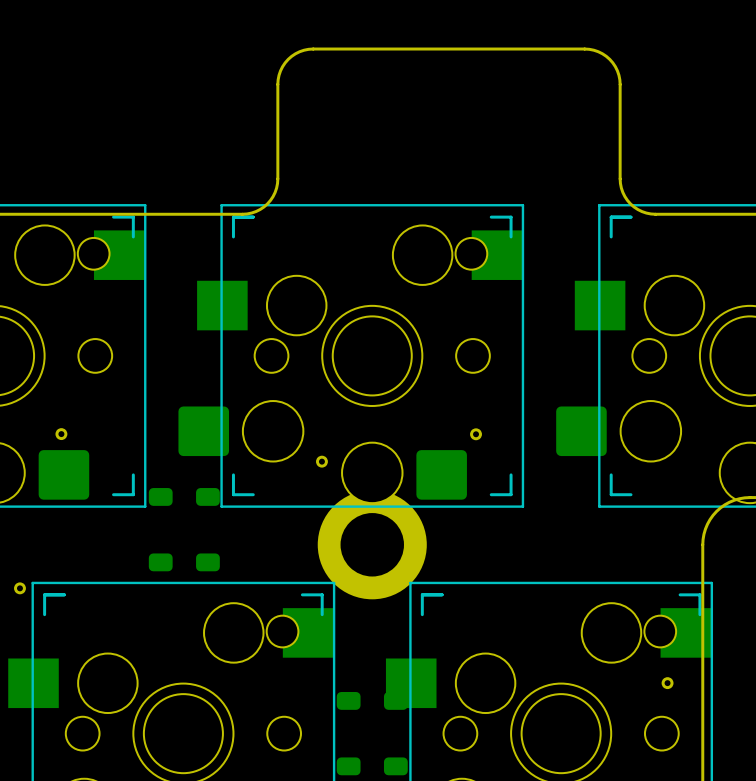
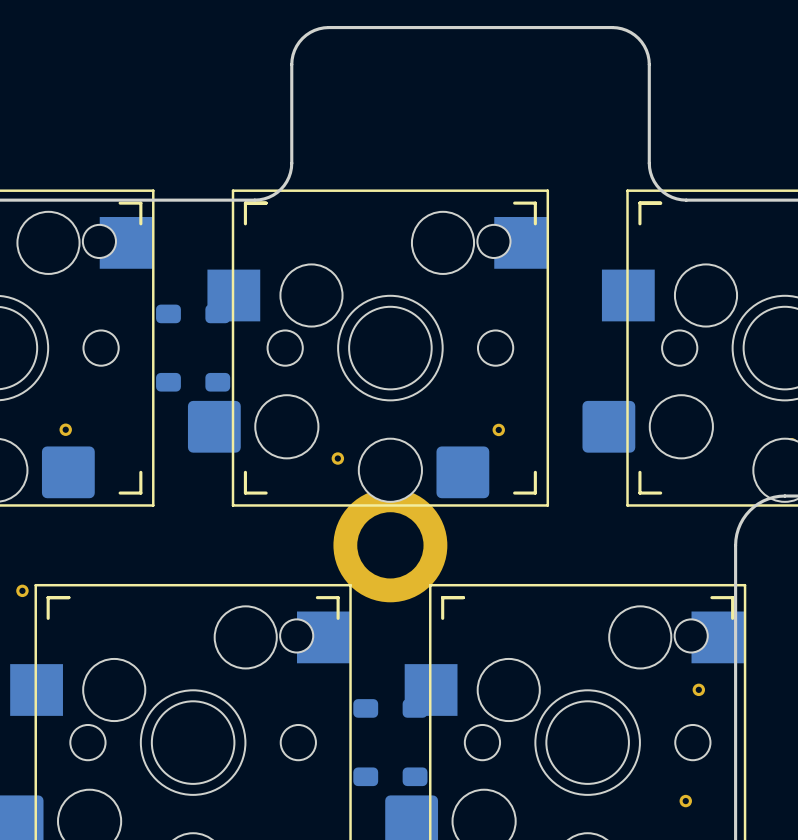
part: none -> (168, 348)
part: none -> (217, 348)
part: (160, 529) -> none
part: (207, 529) -> none

